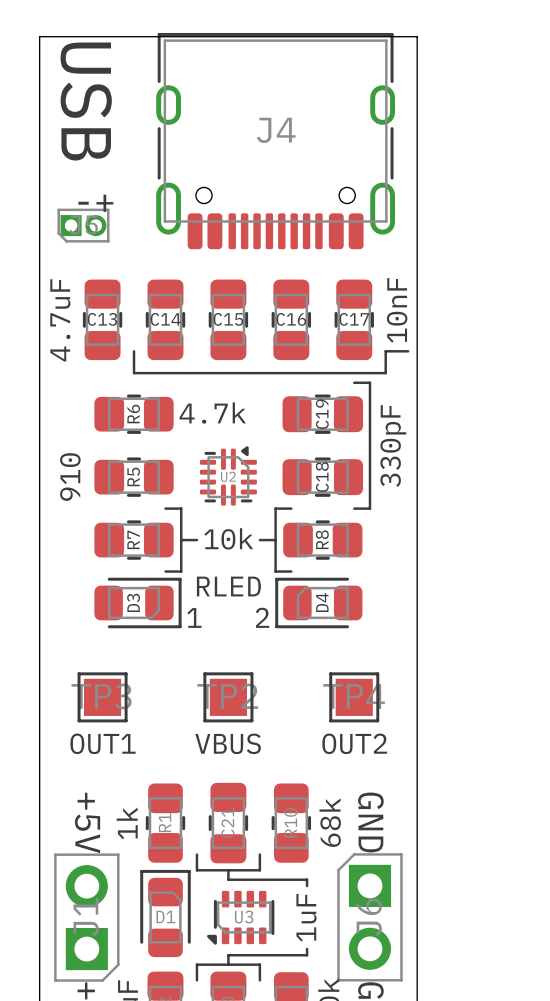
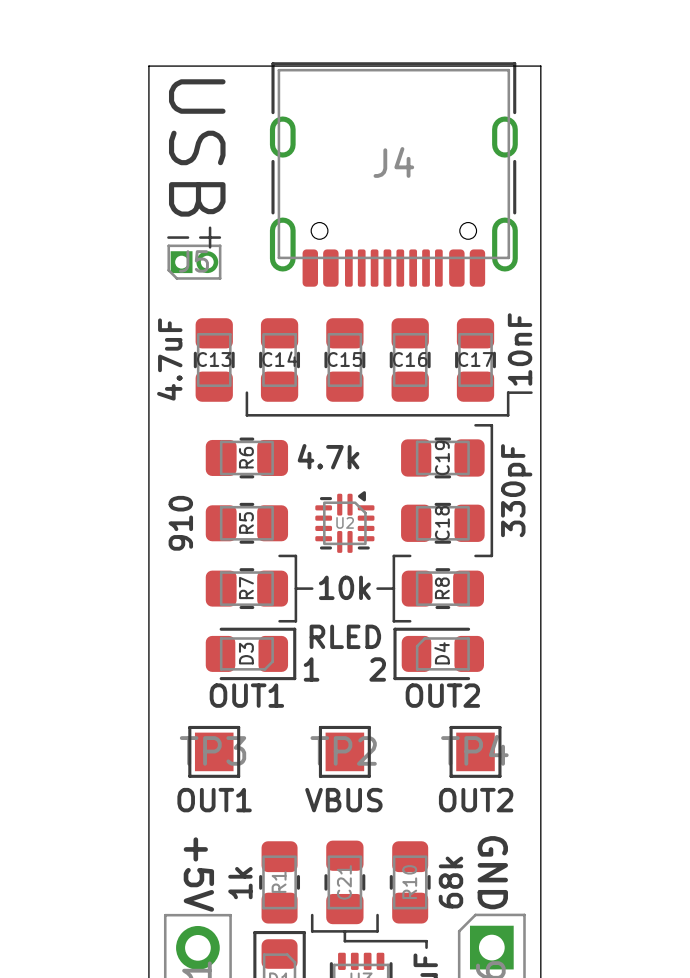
text: none -> OUT1 (246, 695)
text: none -> OUT2 (442, 695)

